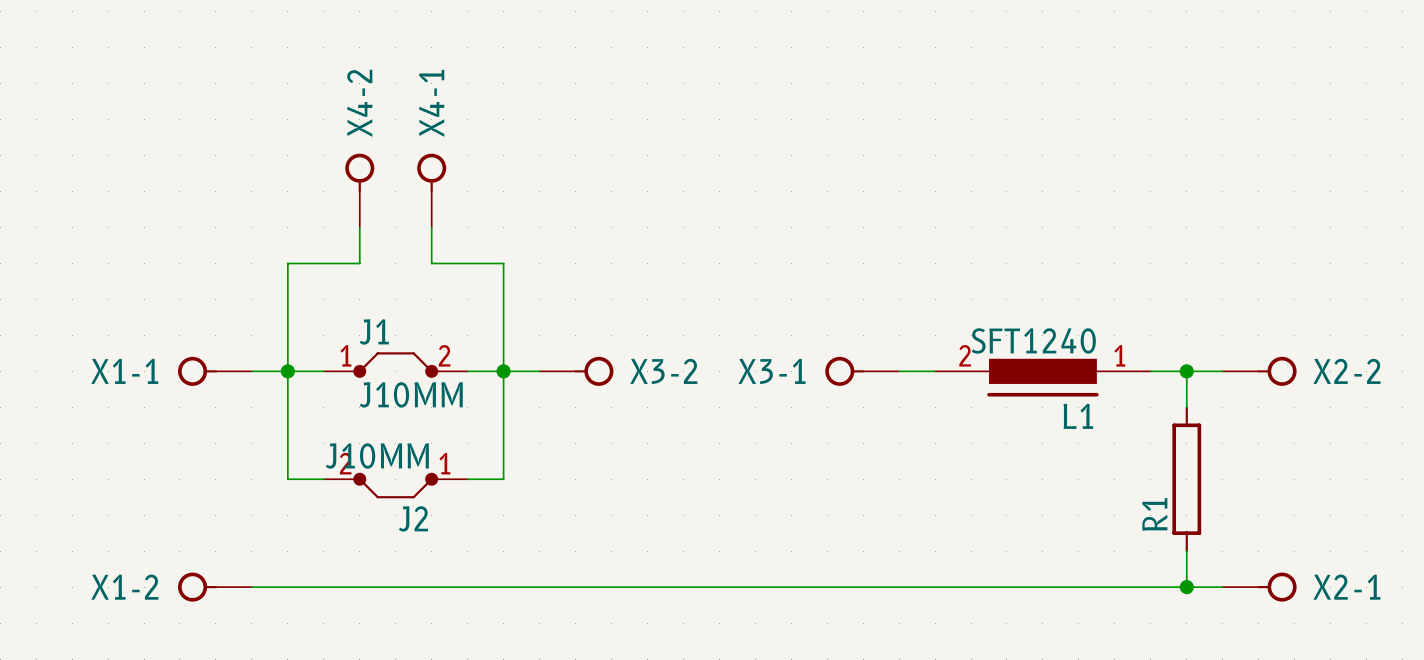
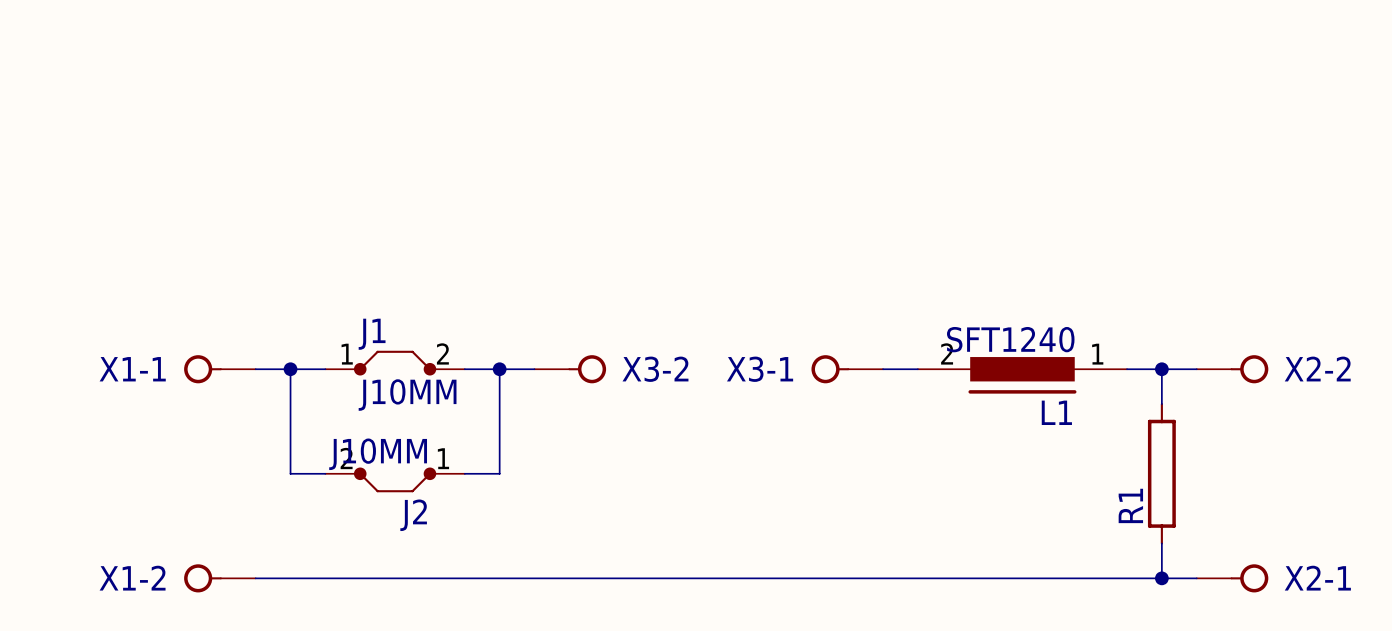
X4-2: (359, 190) -> none
X4-1: (431, 190) -> none
wire: (359, 227) (359, 263) (287, 263) (287, 371) -> none
wire: (431, 227) (431, 263) (503, 263) (503, 371) -> none

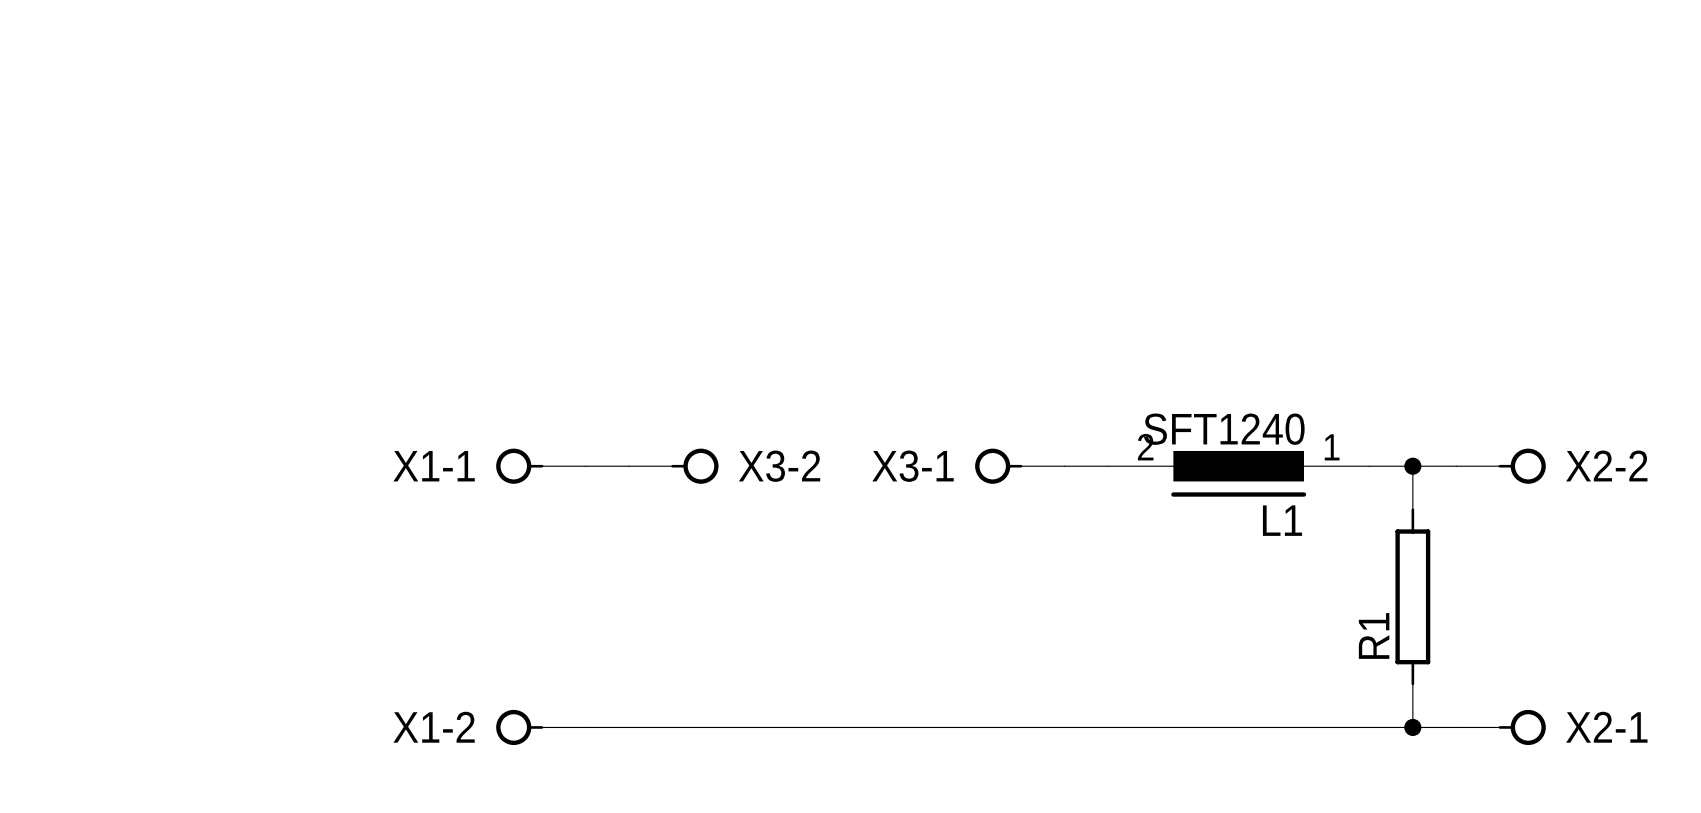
J1: J10MM (395, 363) -> none
X1-1 position: (219, 369) -> (540, 466)
wire: (255, 369) (325, 369) -> none
wire: (290, 369) (290, 473) (325, 473) -> none
junction: (290, 369) -> none
wire: (464, 369) (499, 369) (499, 473) (464, 473) -> none
junction: (499, 369) -> none
J2: J10MM (395, 479) -> none
X1-2 position: (219, 578) -> (540, 727)
wire: (255, 578) (499, 578) -> none

